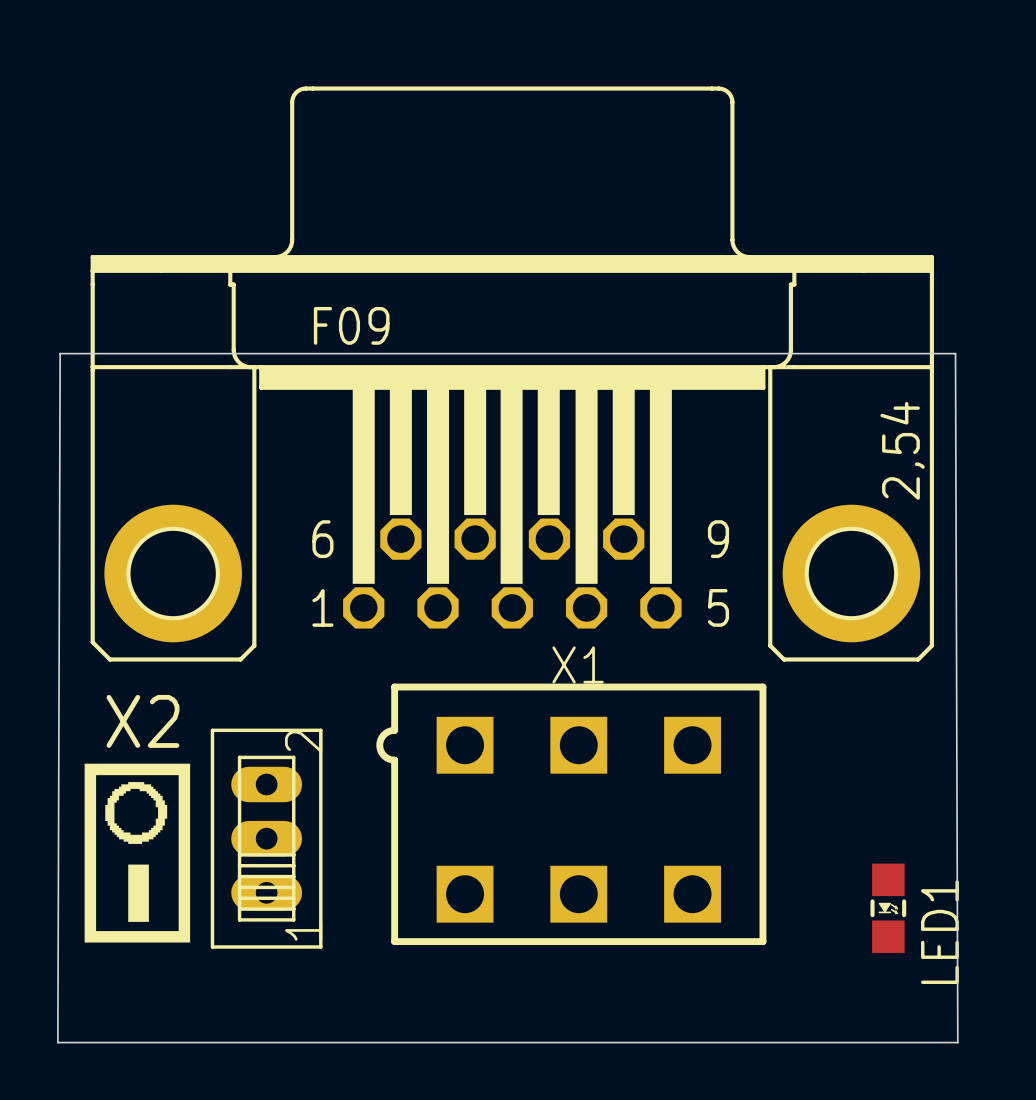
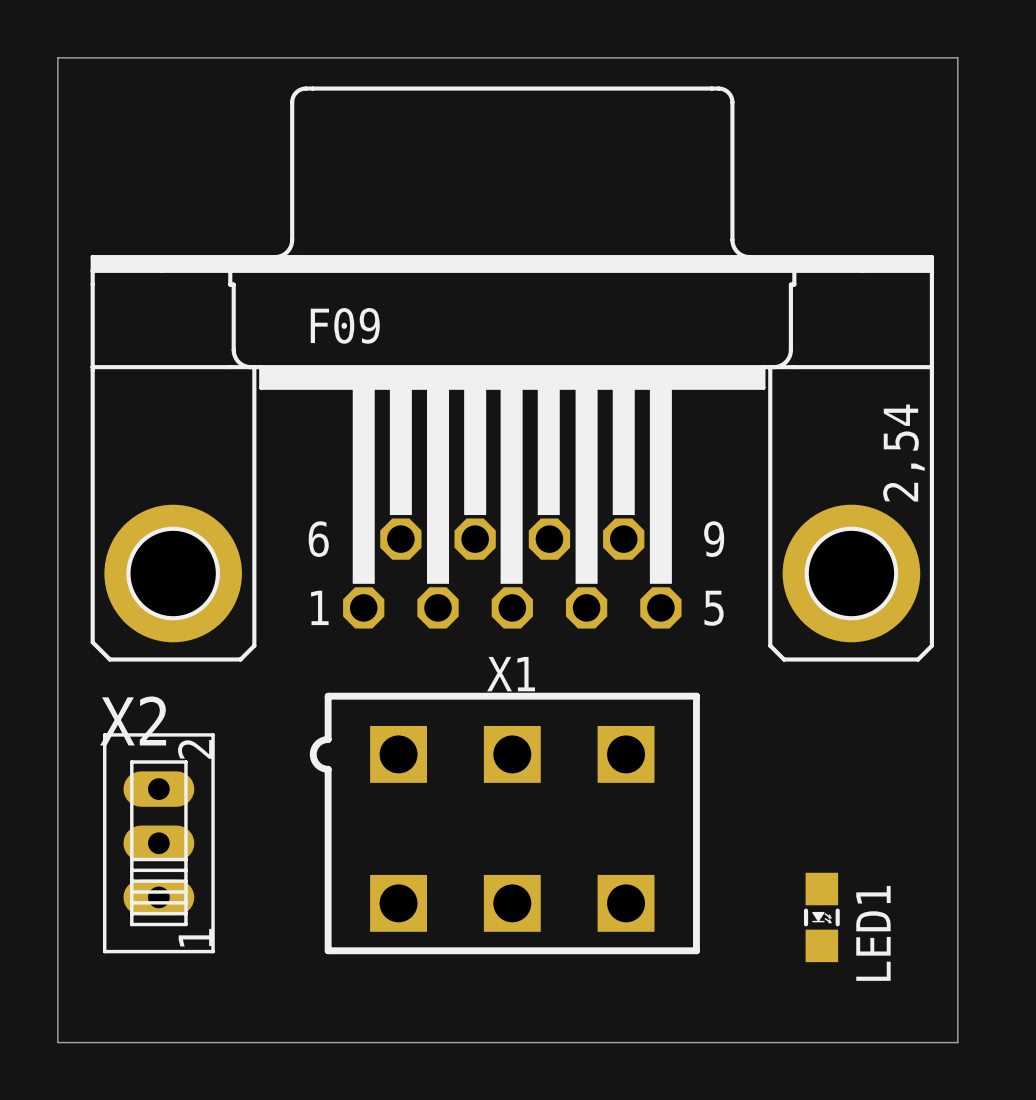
drawing: [84, 763, 191, 943] -> none
X1 position: (571, 814) -> (504, 823)
part position: (266, 838) -> (158, 843)
LED1 position: (888, 908) -> (821, 917)
board edge: (57, 1042) (60, 353) (955, 353) (957, 1042) -> (57, 1042) (57, 57) (957, 57) (957, 1042)

